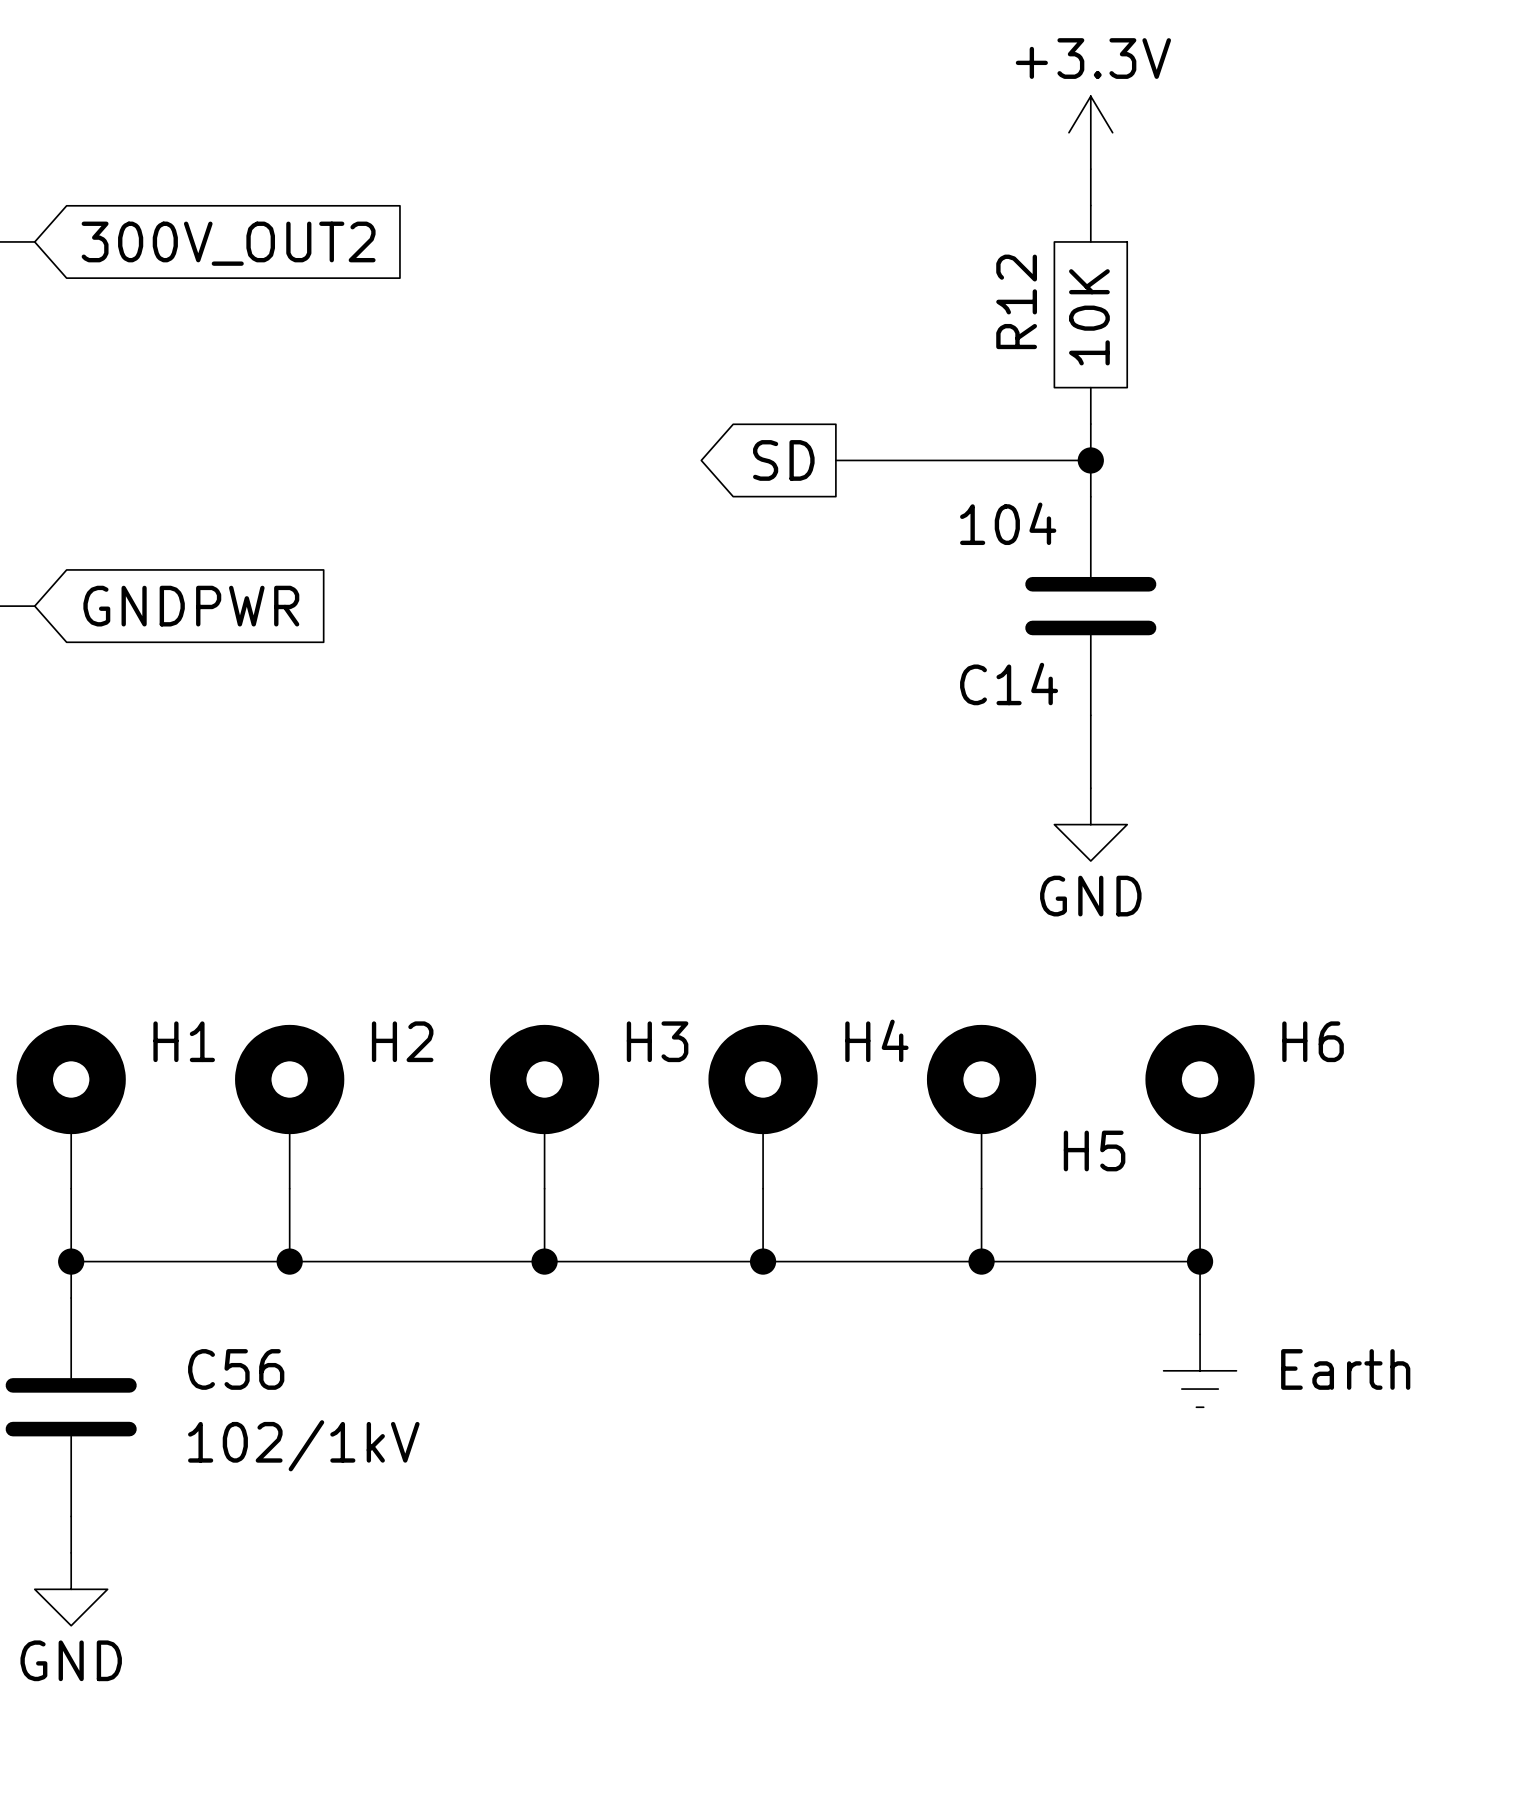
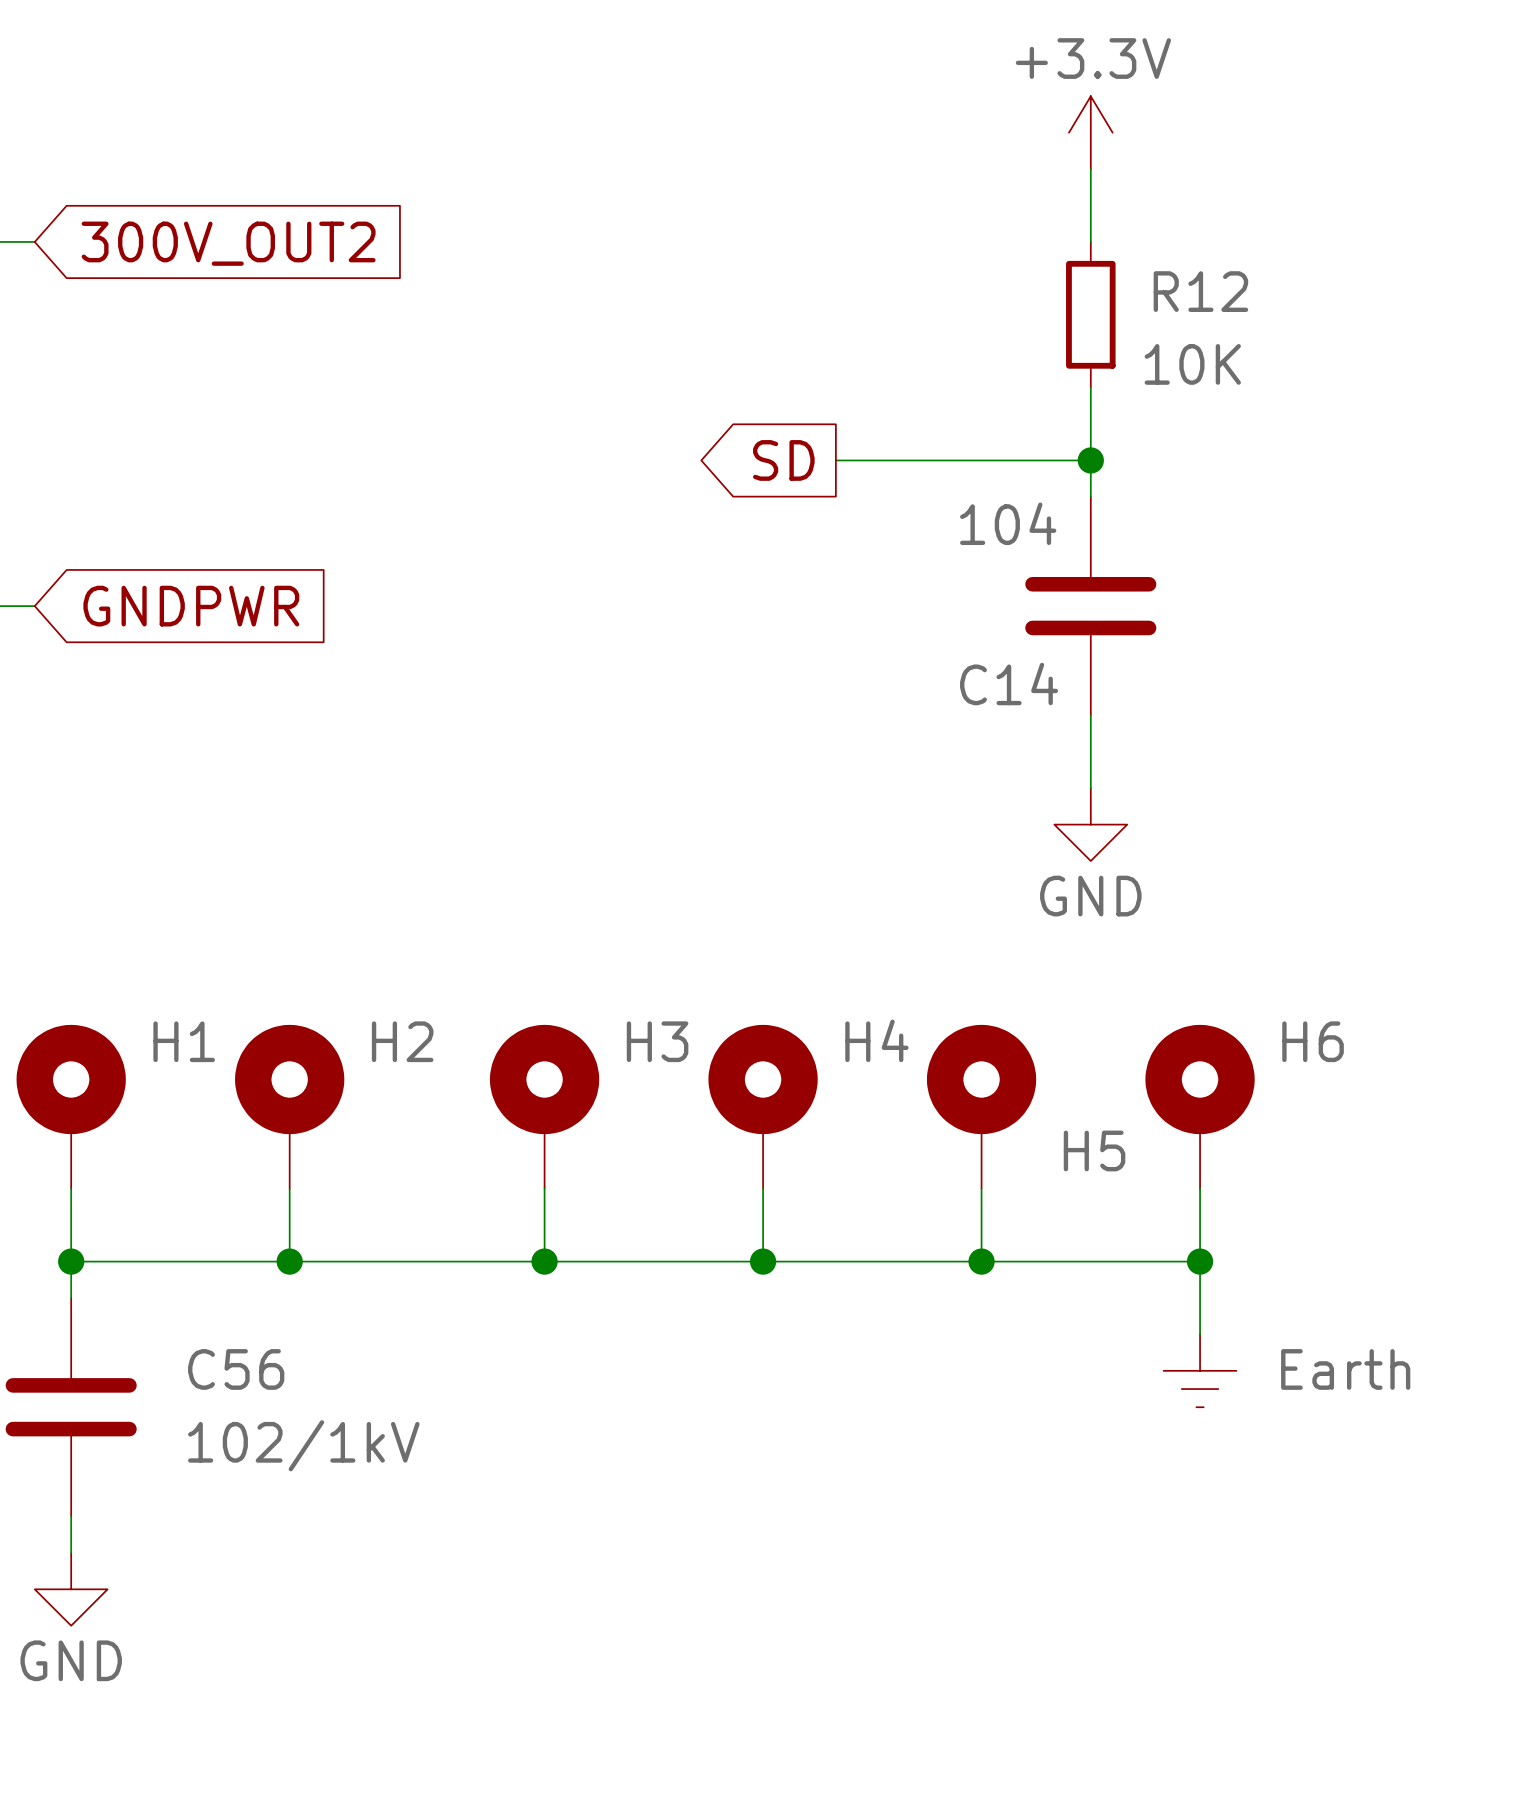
R12 symbol: [1054, 205, 1128, 425] -> [1066, 241, 1116, 388]
R12 name position: R12 (1016, 301) -> R12 (1200, 291)
R12 value position: 10K (1089, 317) -> 10K (1192, 364)

